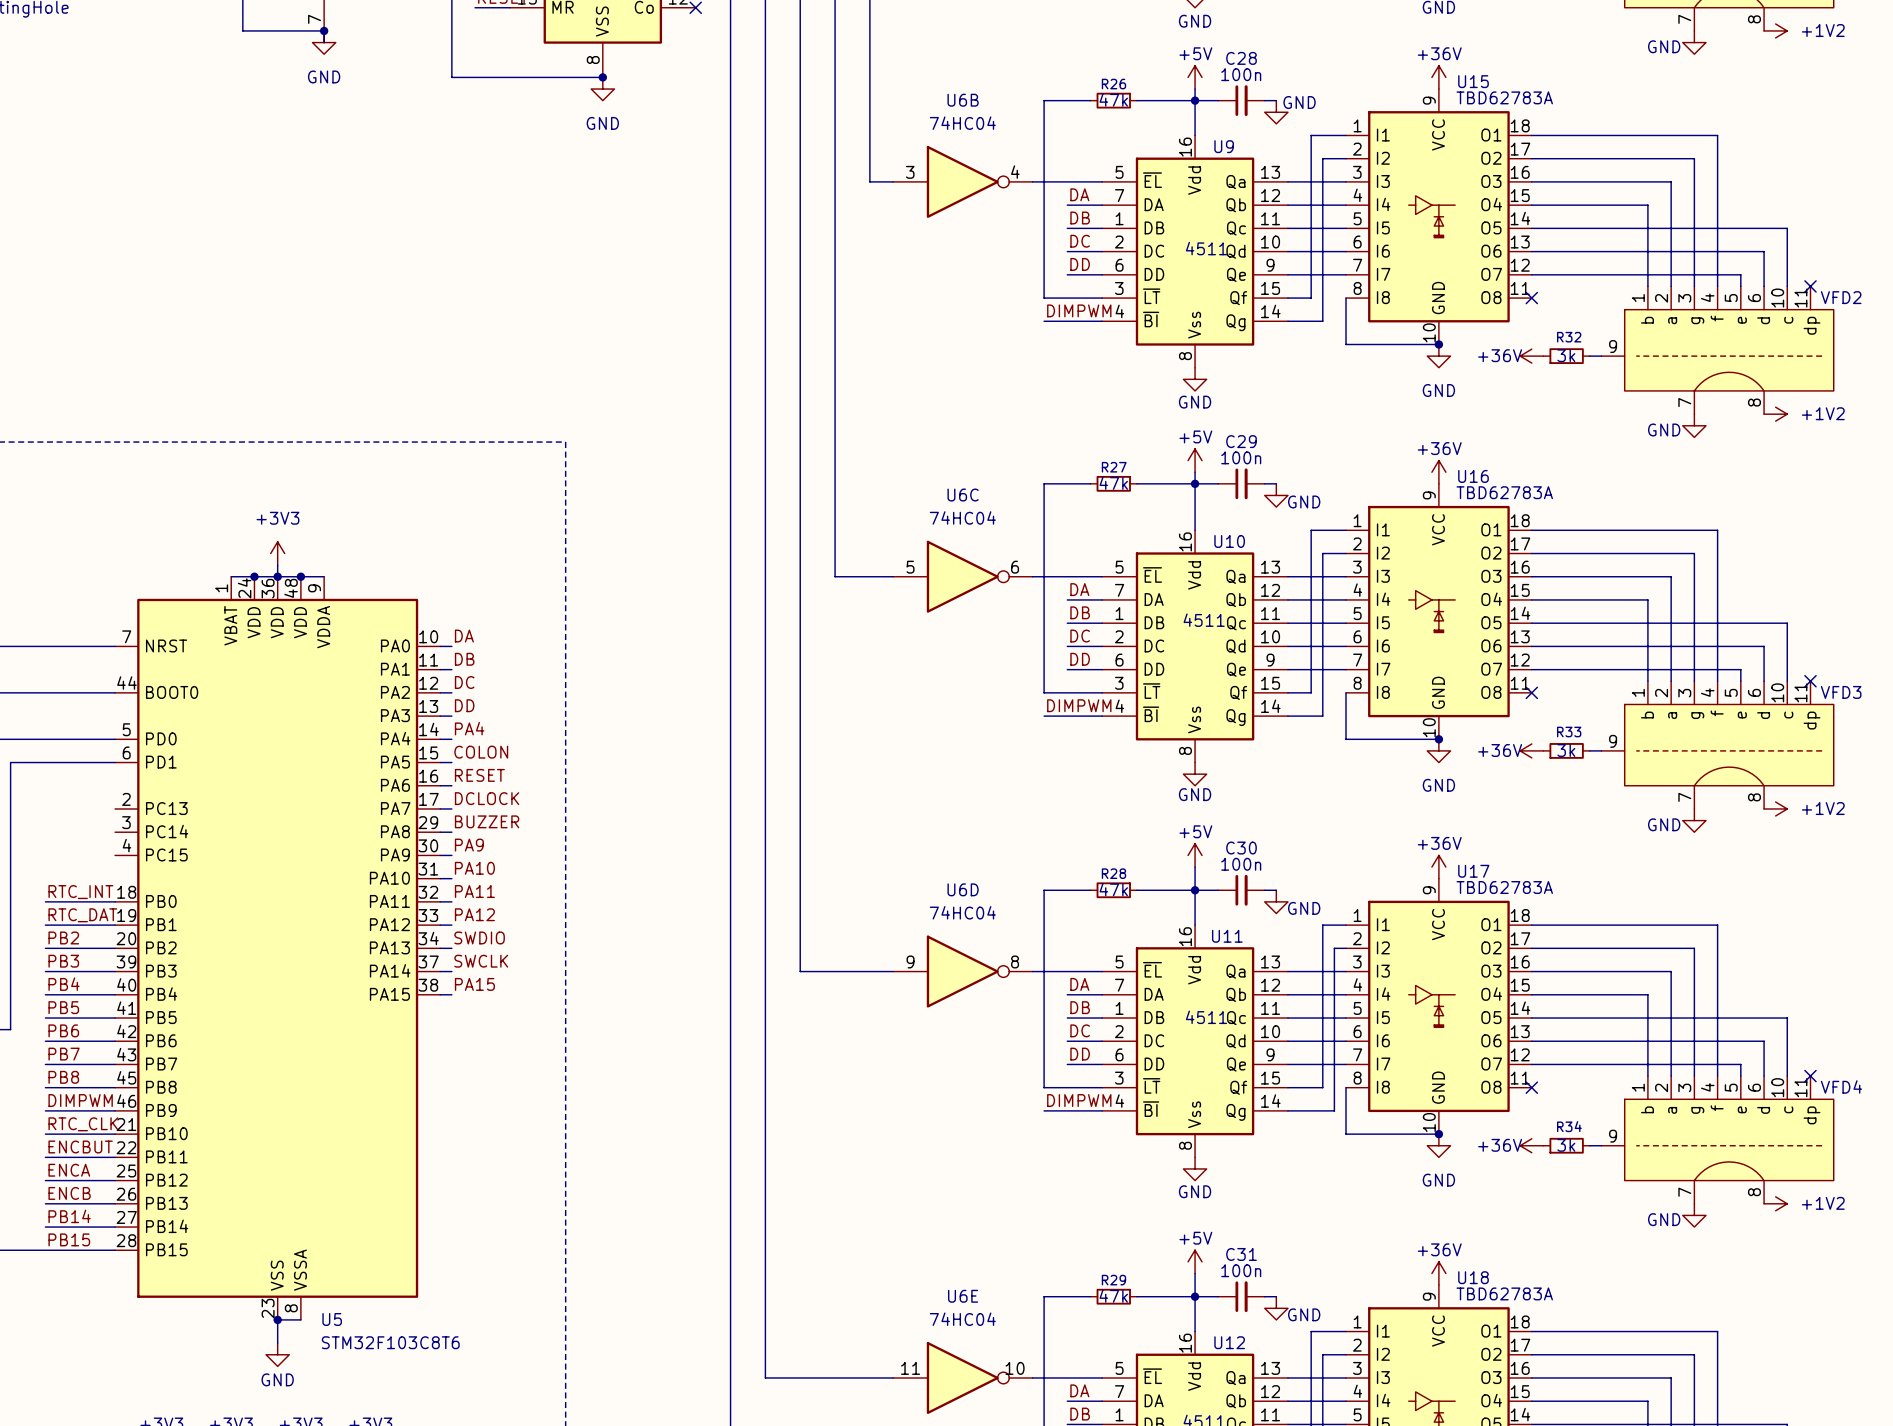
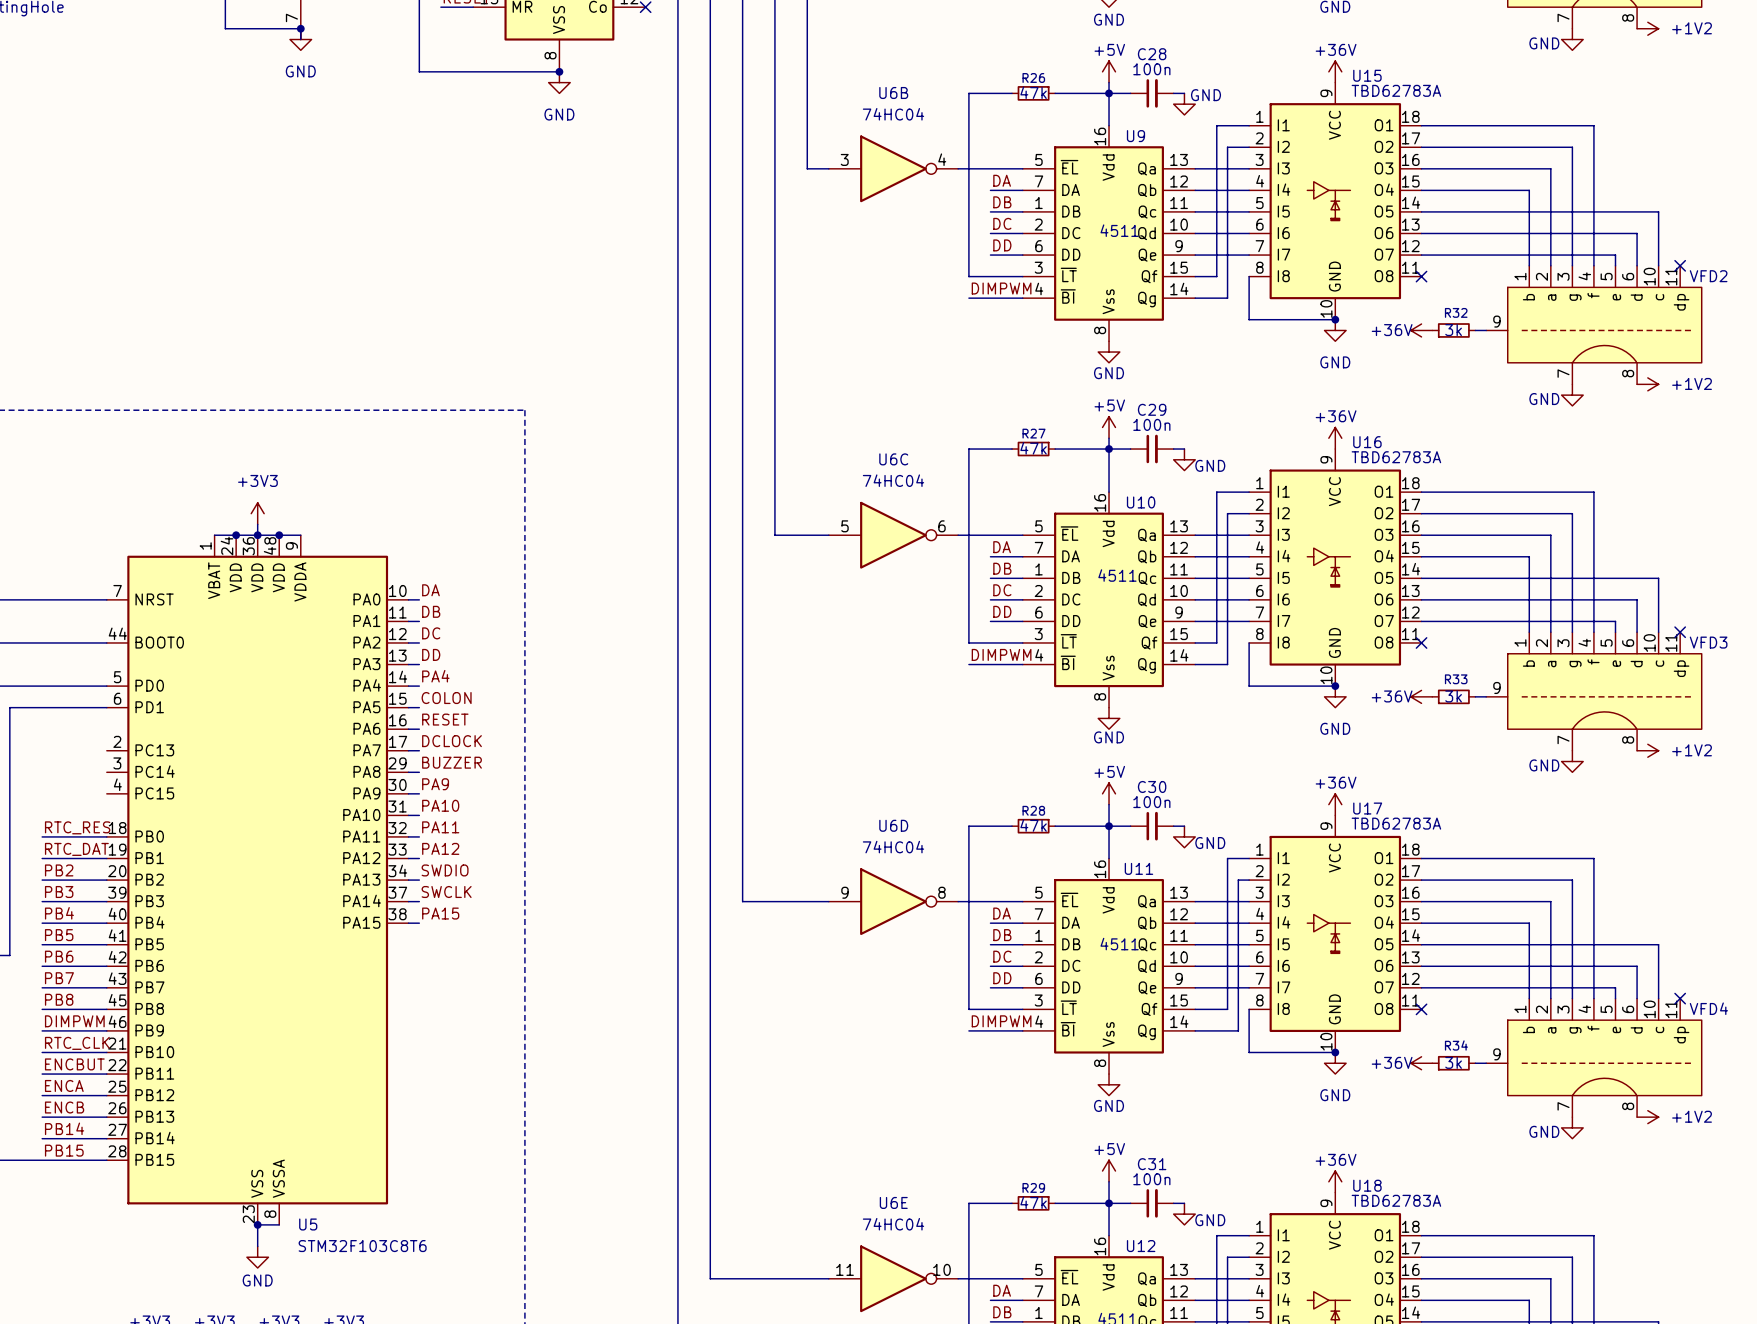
label: RTC_INT (80, 892) -> RTC_RES (77, 827)

